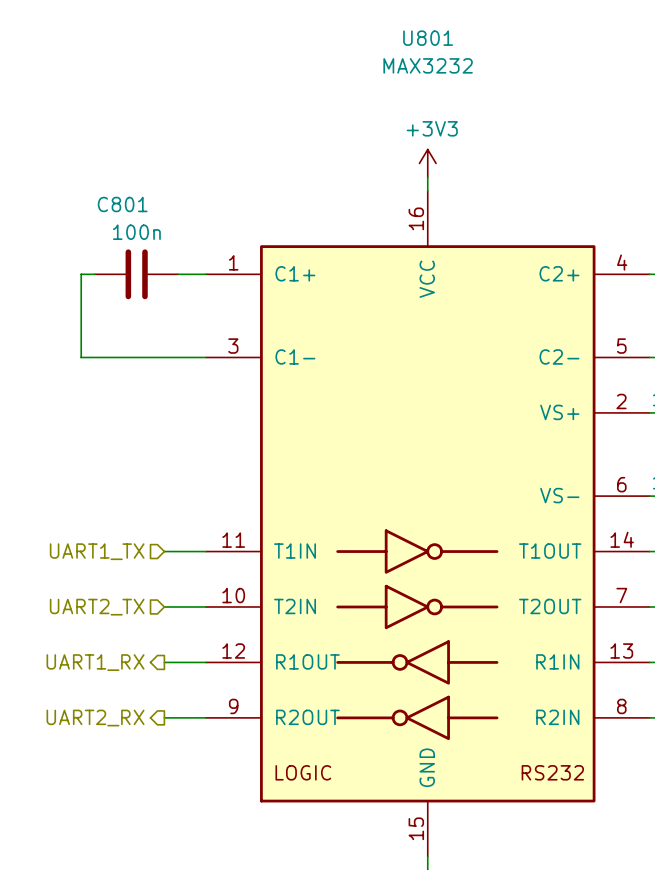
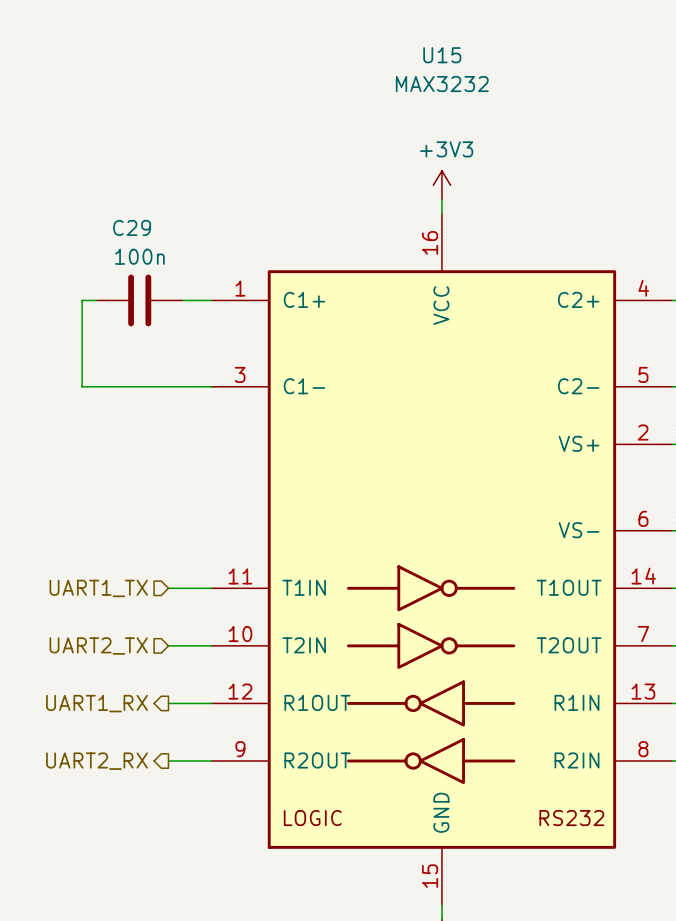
U801 name: U801 (428, 38) -> U15 (442, 55)
C801 name: C801 (122, 204) -> C29 (132, 227)

